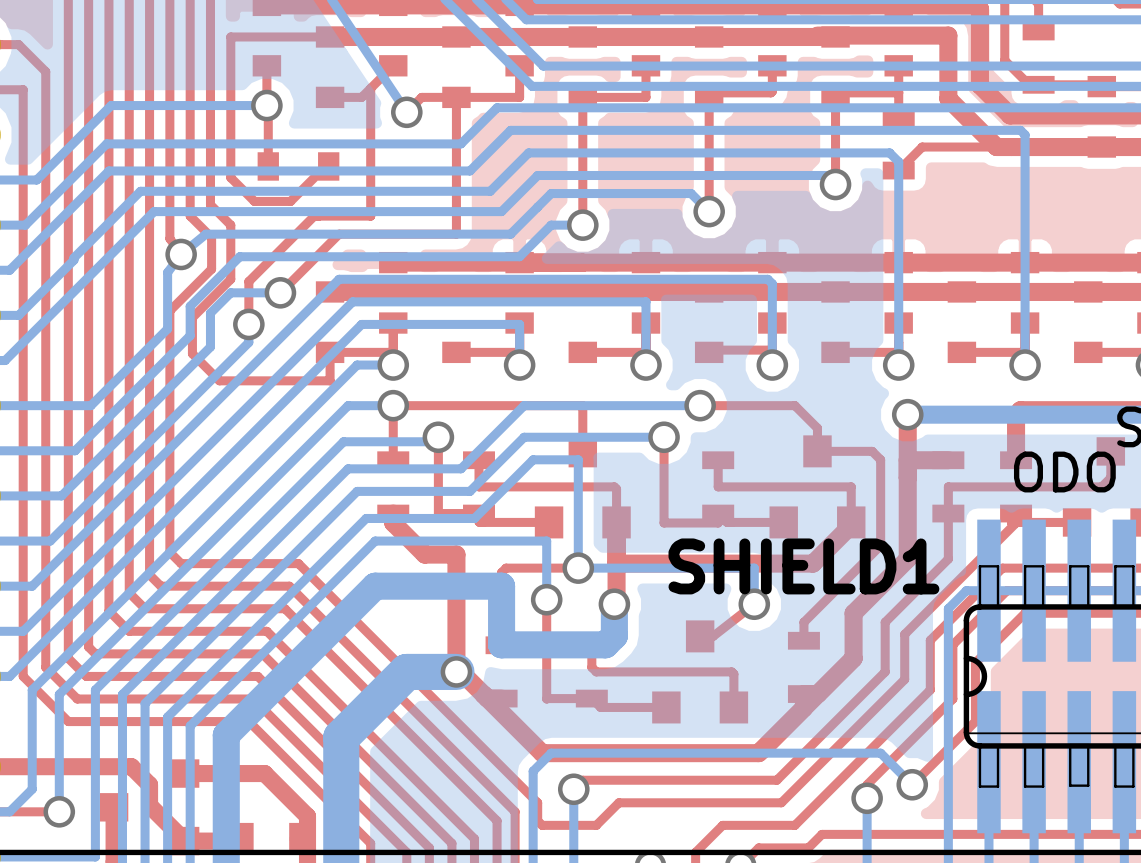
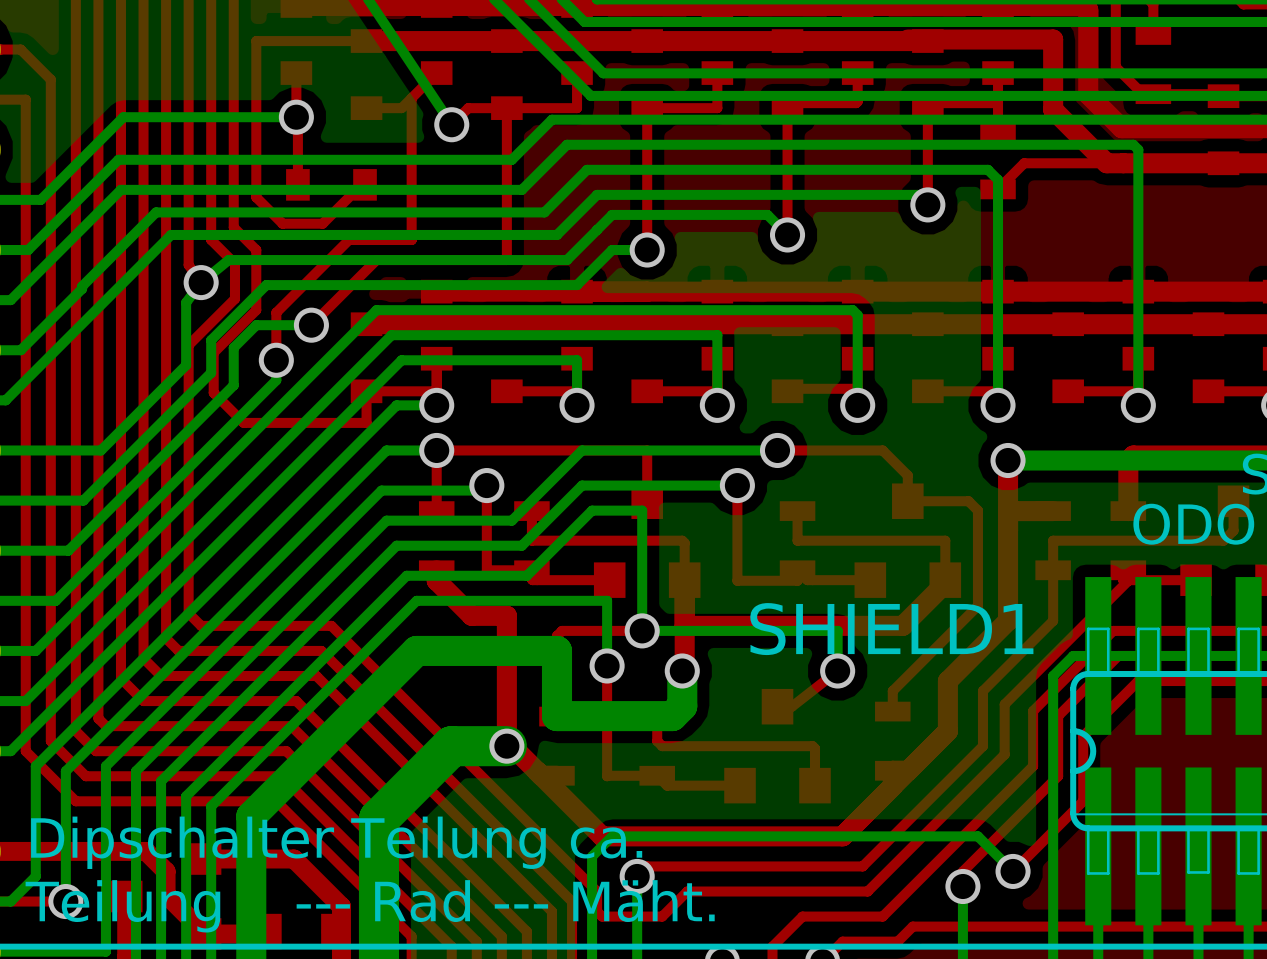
text: none -> Dipschalter Teilung ca. (336, 842)
text: none -> Teilung --- Rad --- Mäht. (370, 906)

